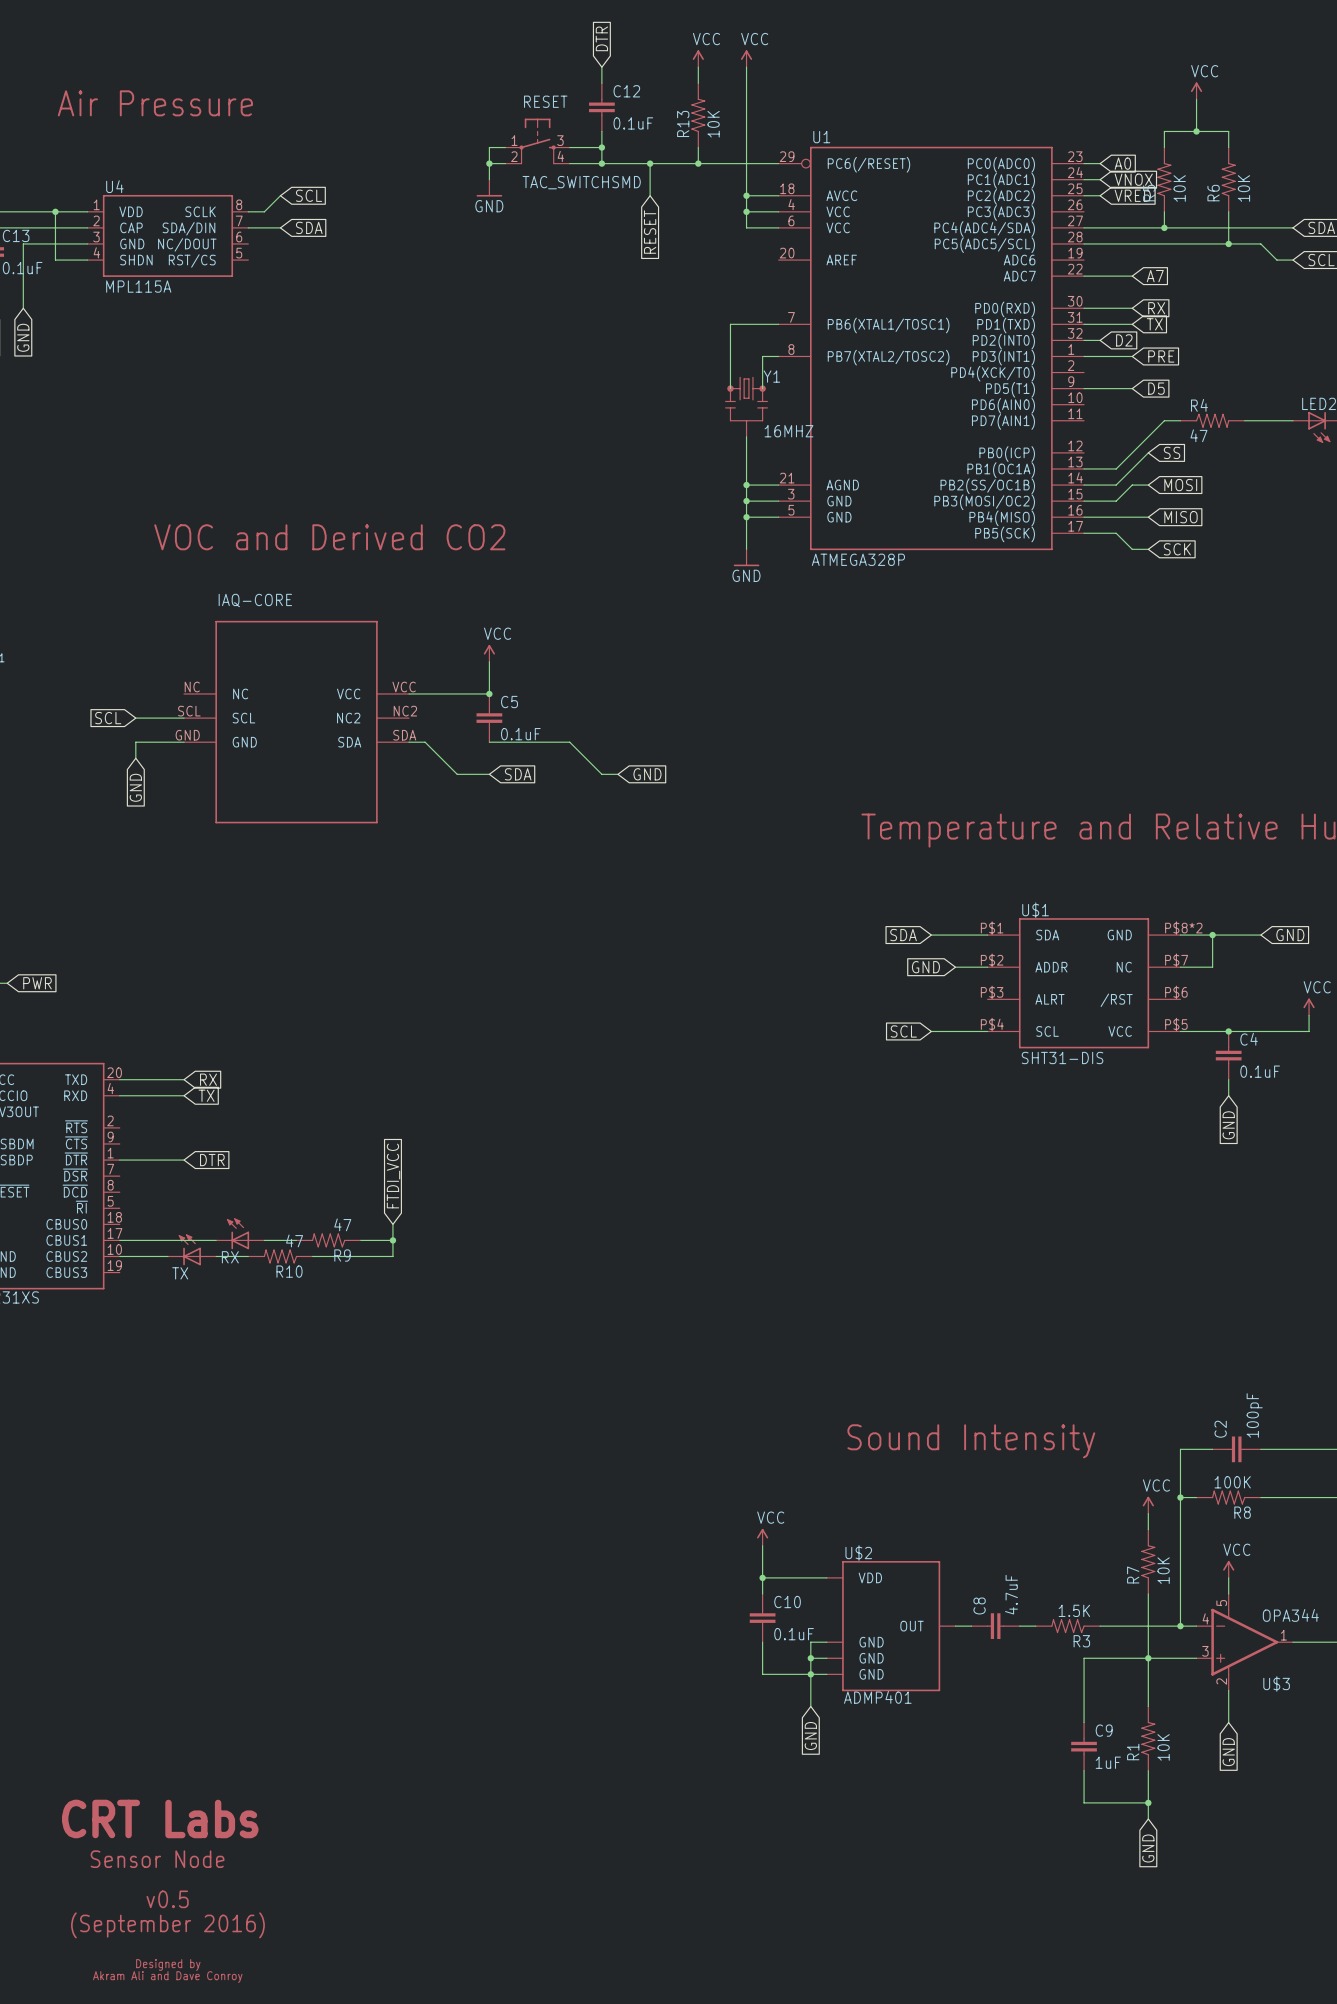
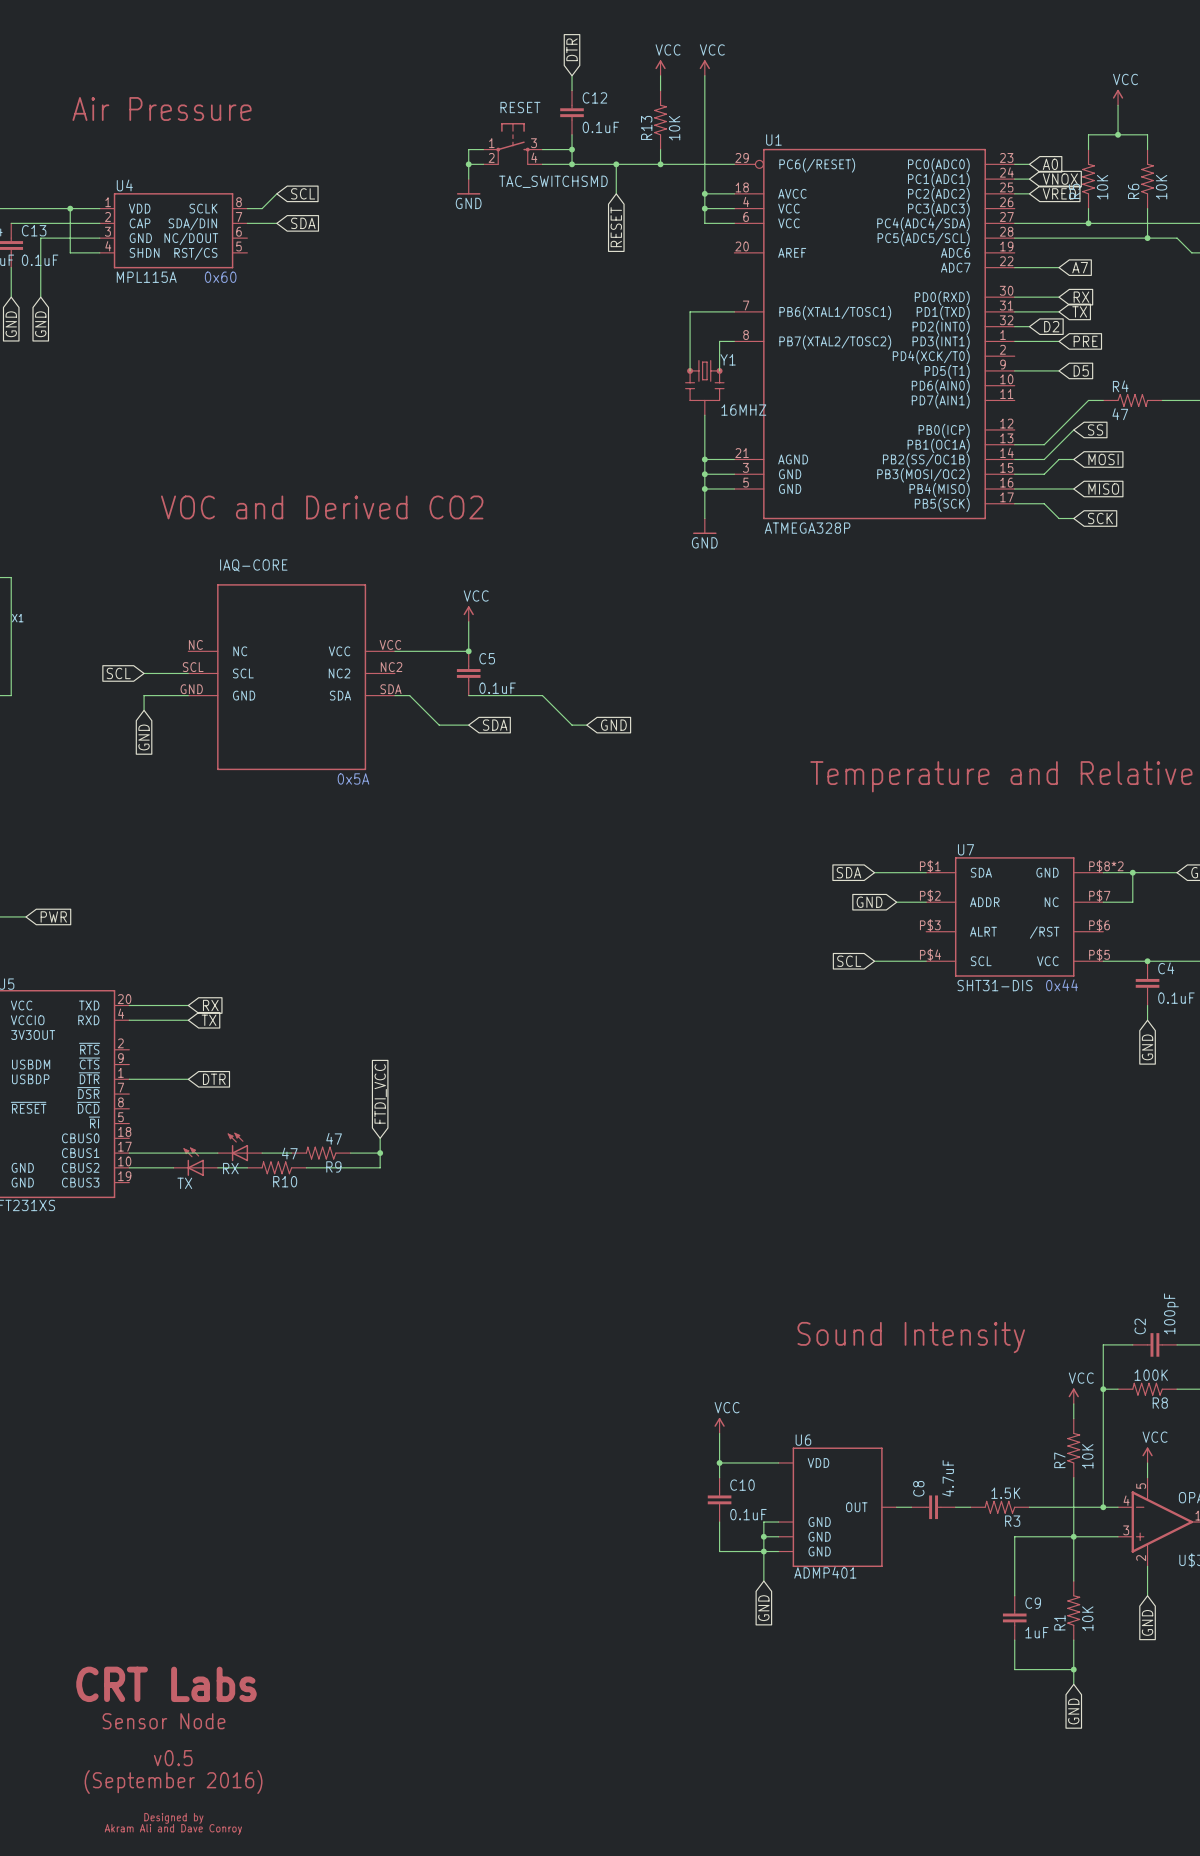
text: none -> 0x60 (220, 277)
text: none -> 0x5A (353, 778)
U$1 name: U$1 (1035, 910) -> U7 (965, 849)
text: none -> 0x44 (1062, 985)
U$2 name: U$2 (858, 1553) -> U6 (803, 1440)

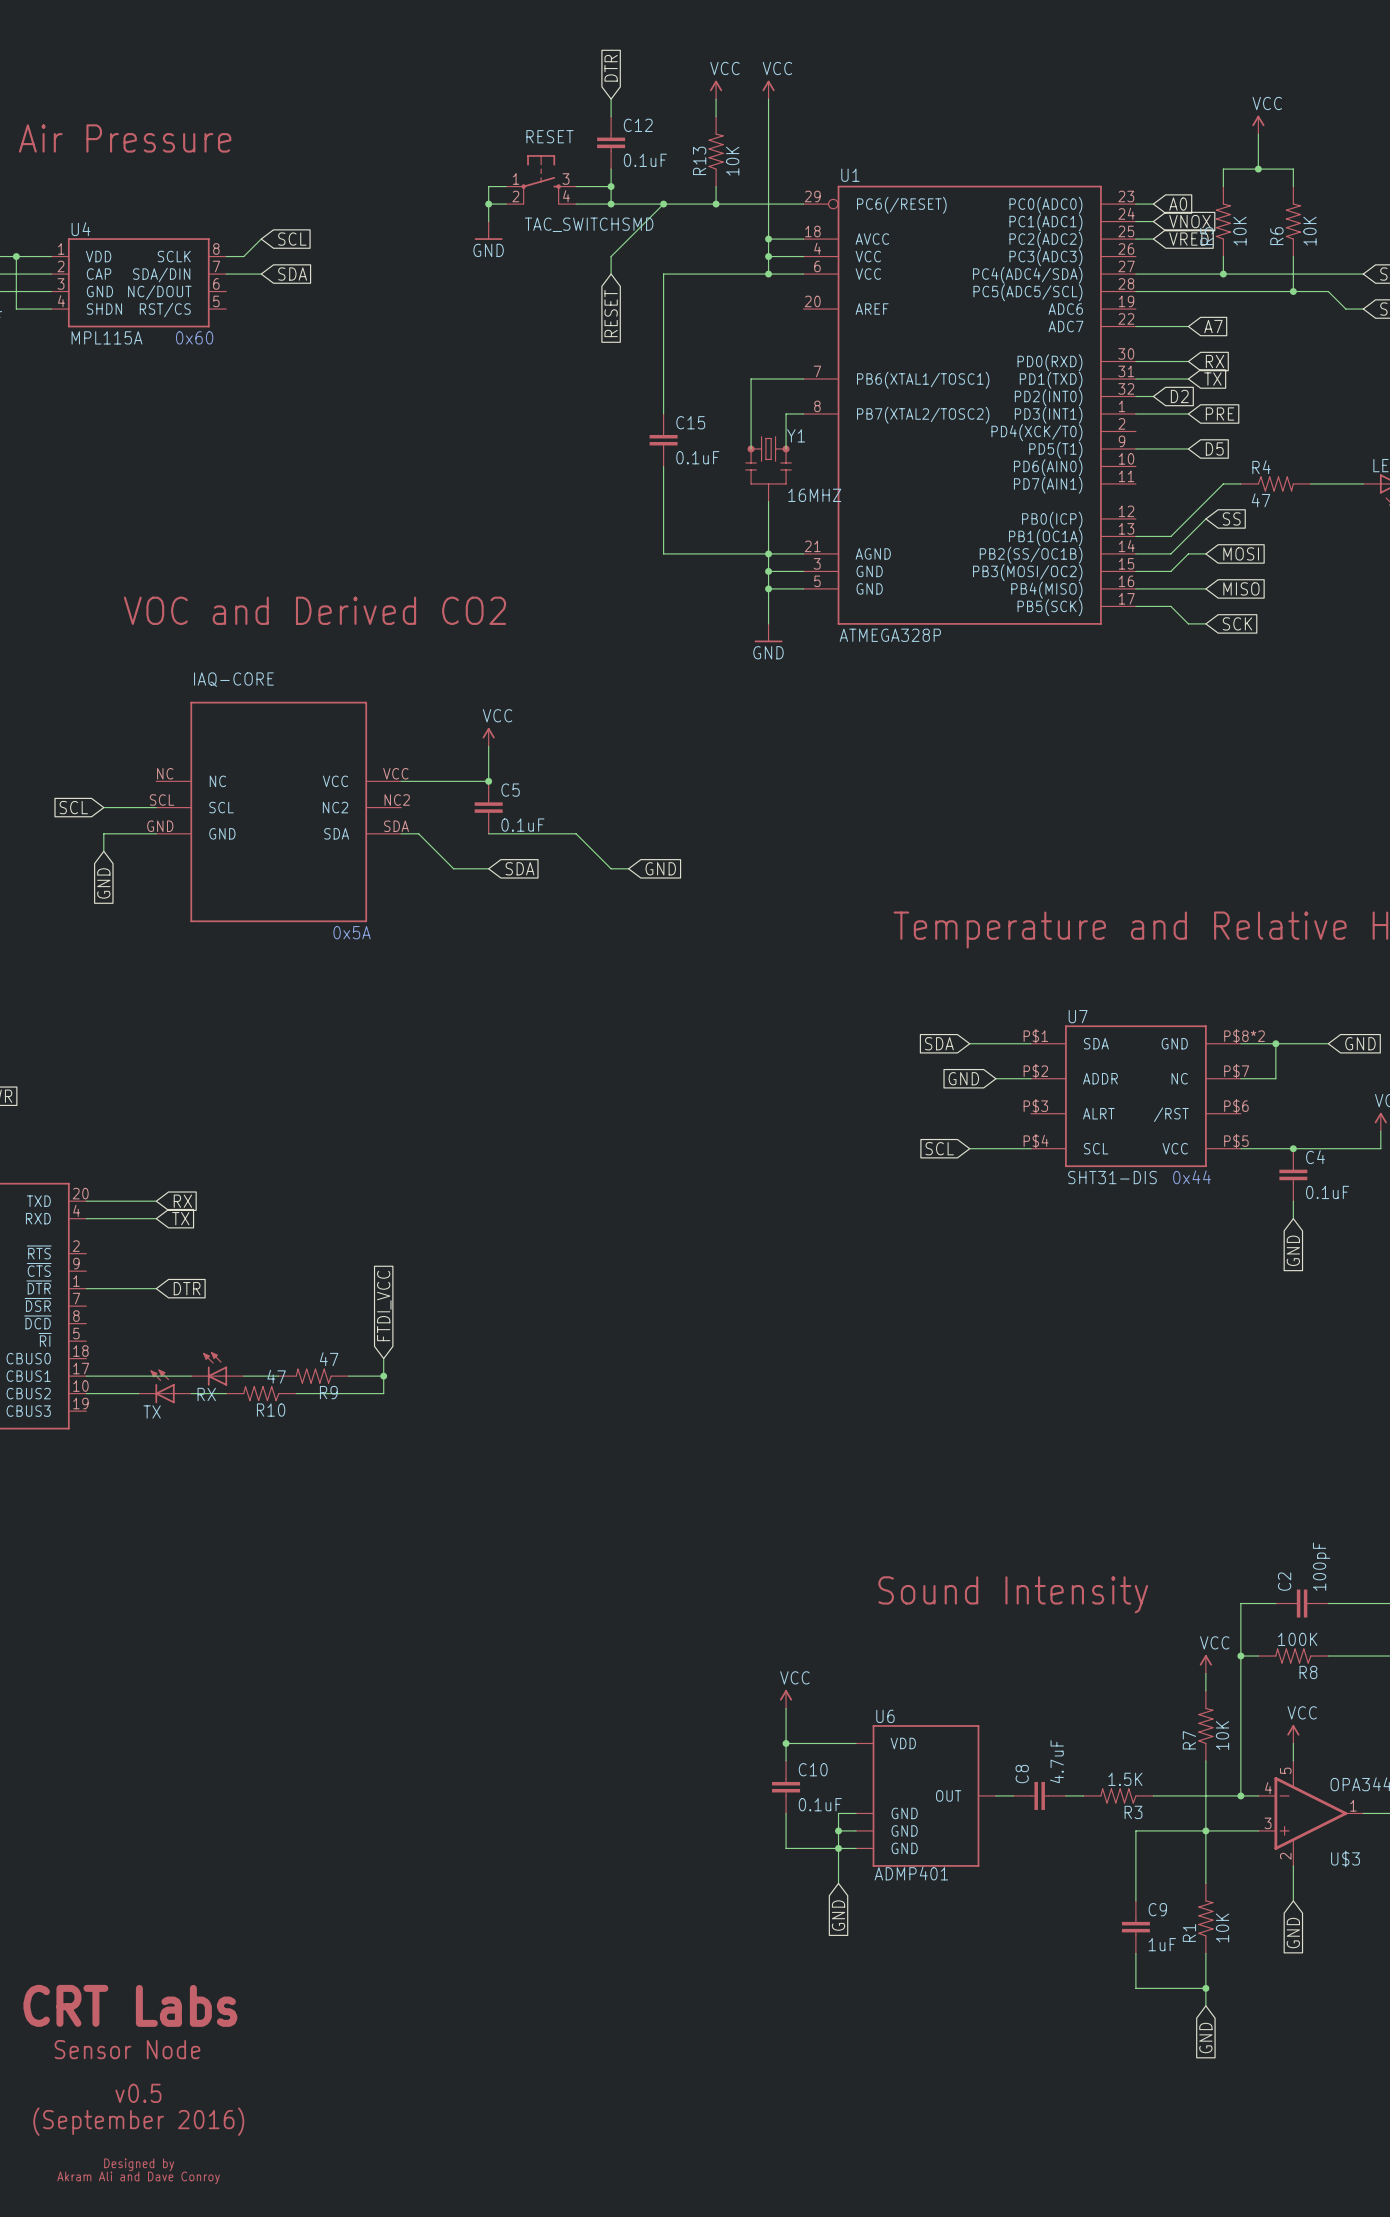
wire: (616, 164) (616, 193) -> (663, 204) (611, 256) (611, 274)
wire: none -> (768, 274) (663, 274) (663, 413)
junction: none -> (768, 274)
global label position: RESET (616, 227) -> RESET (611, 313)
C15: none -> 0.1uF (663, 440)
wire: none -> (663, 466) (663, 553) (768, 553)

